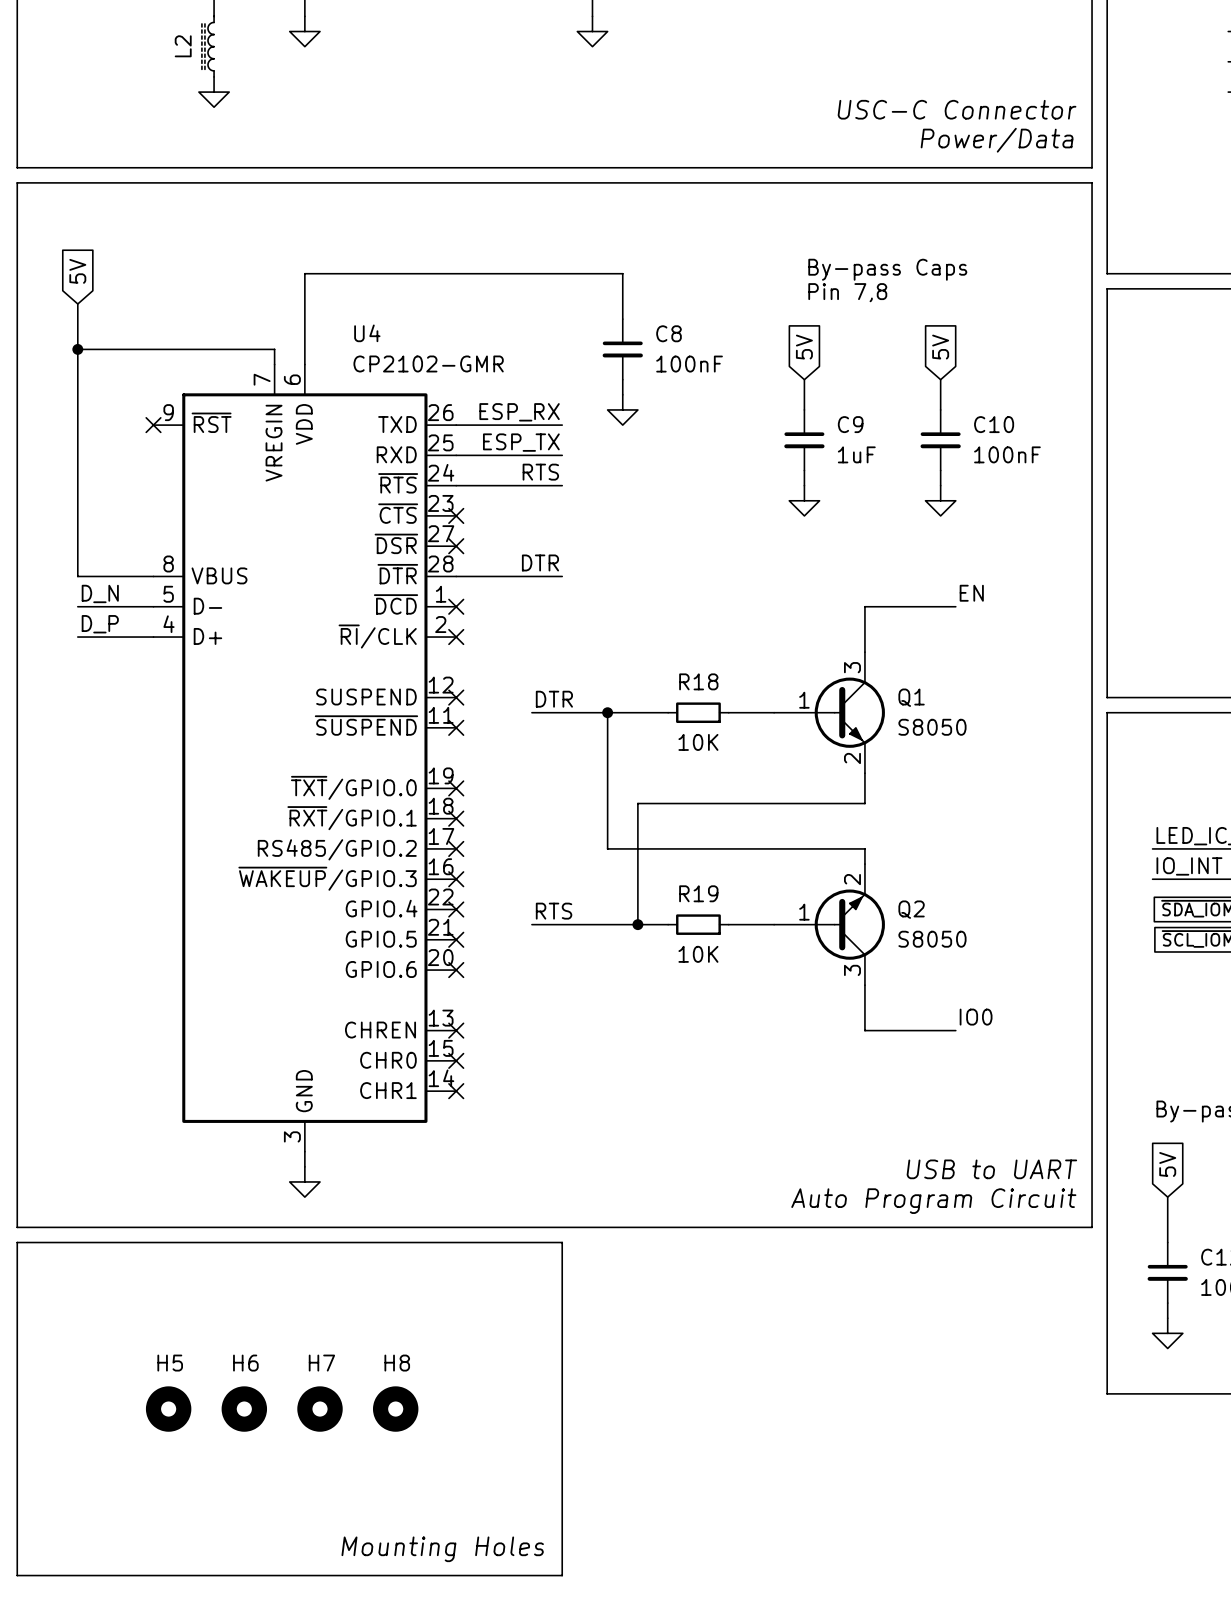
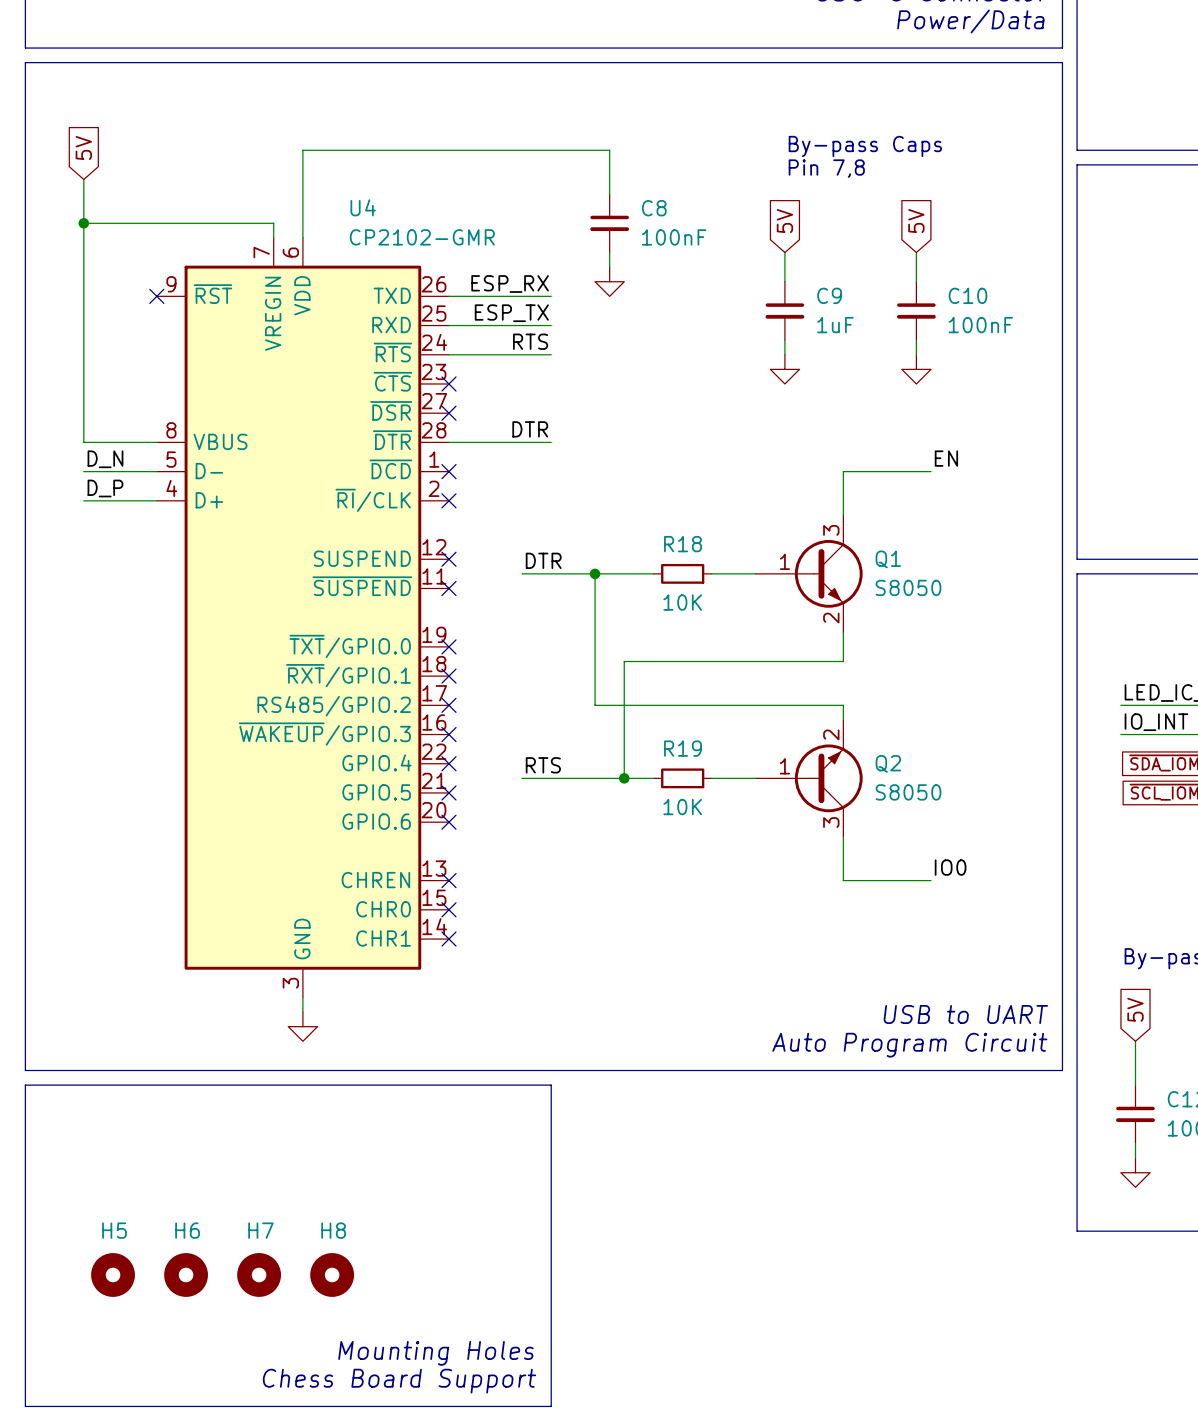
H5 position: (168, 1409) -> (113, 1274)
H6 position: (244, 1409) -> (186, 1274)
H7 position: (320, 1409) -> (259, 1274)
H8 position: (395, 1409) -> (332, 1274)
text: none -> Mounting Holes (435, 1353)
text: Mounting Holes (442, 1549) -> Chess Board Support (399, 1381)

